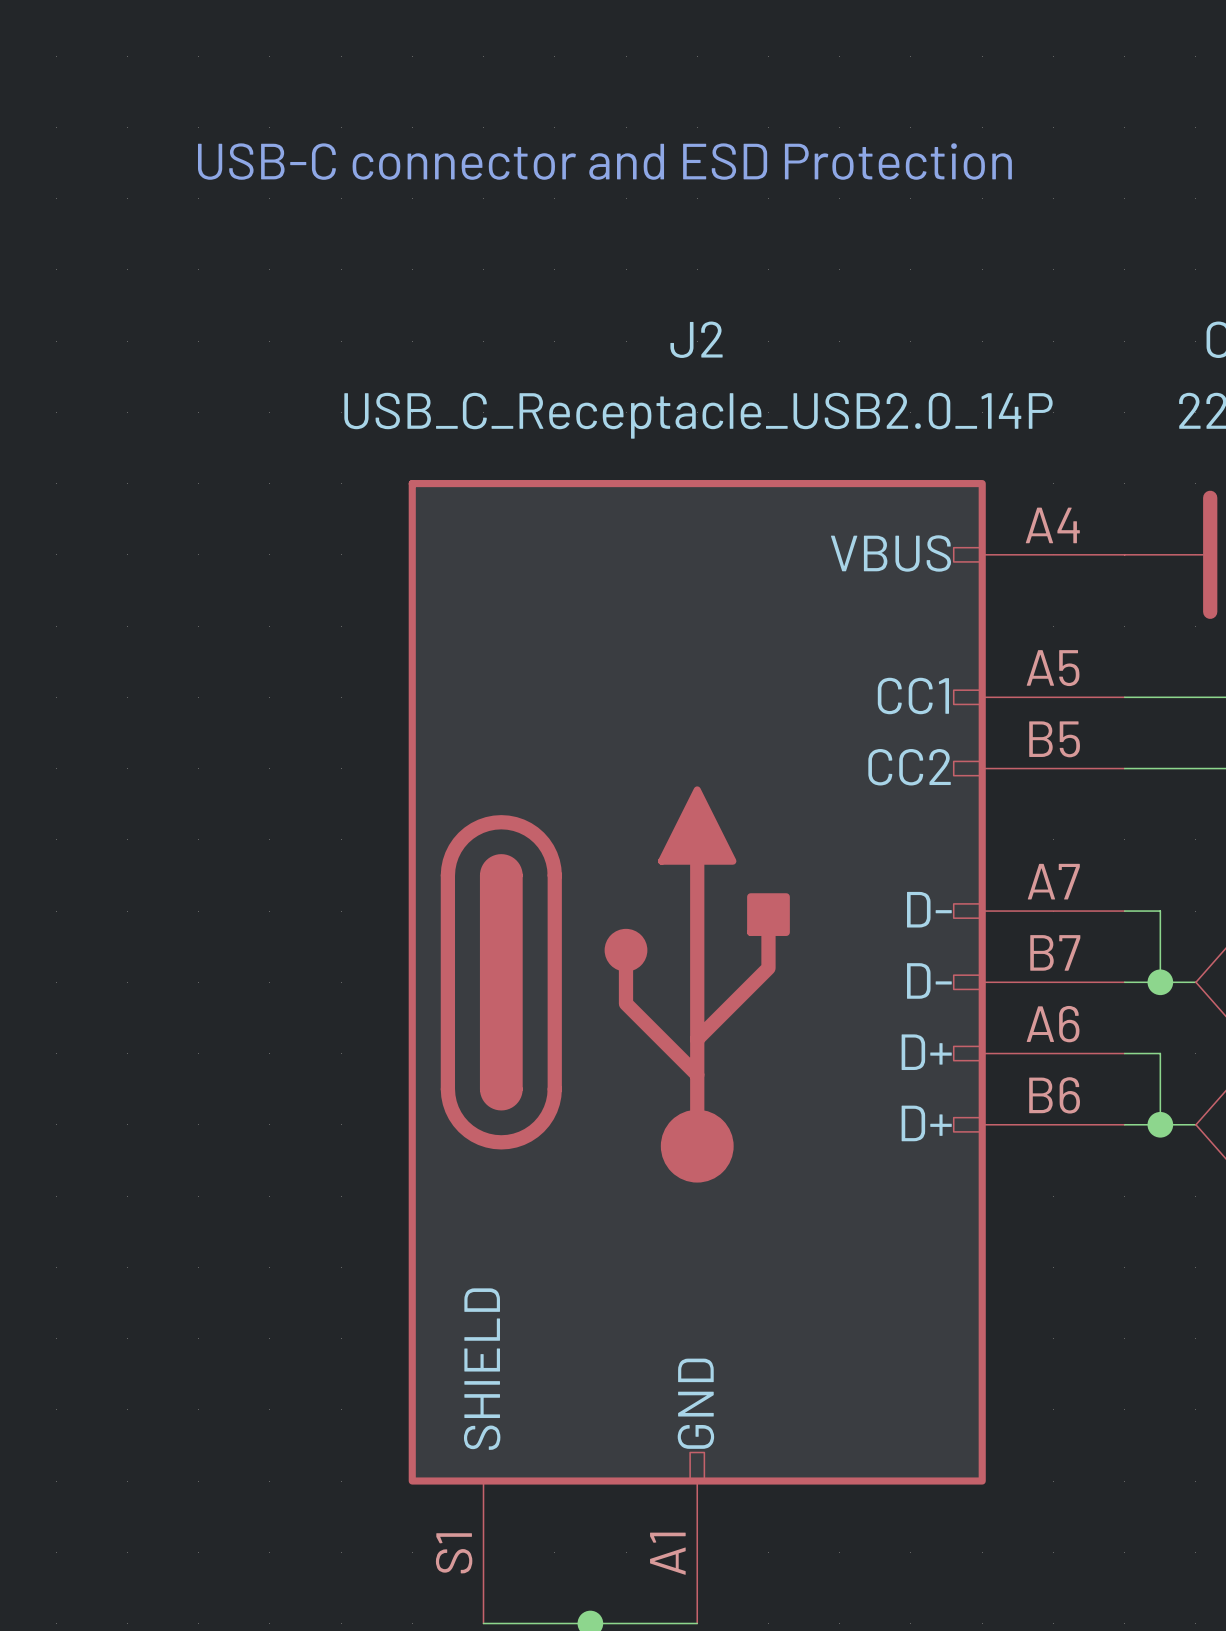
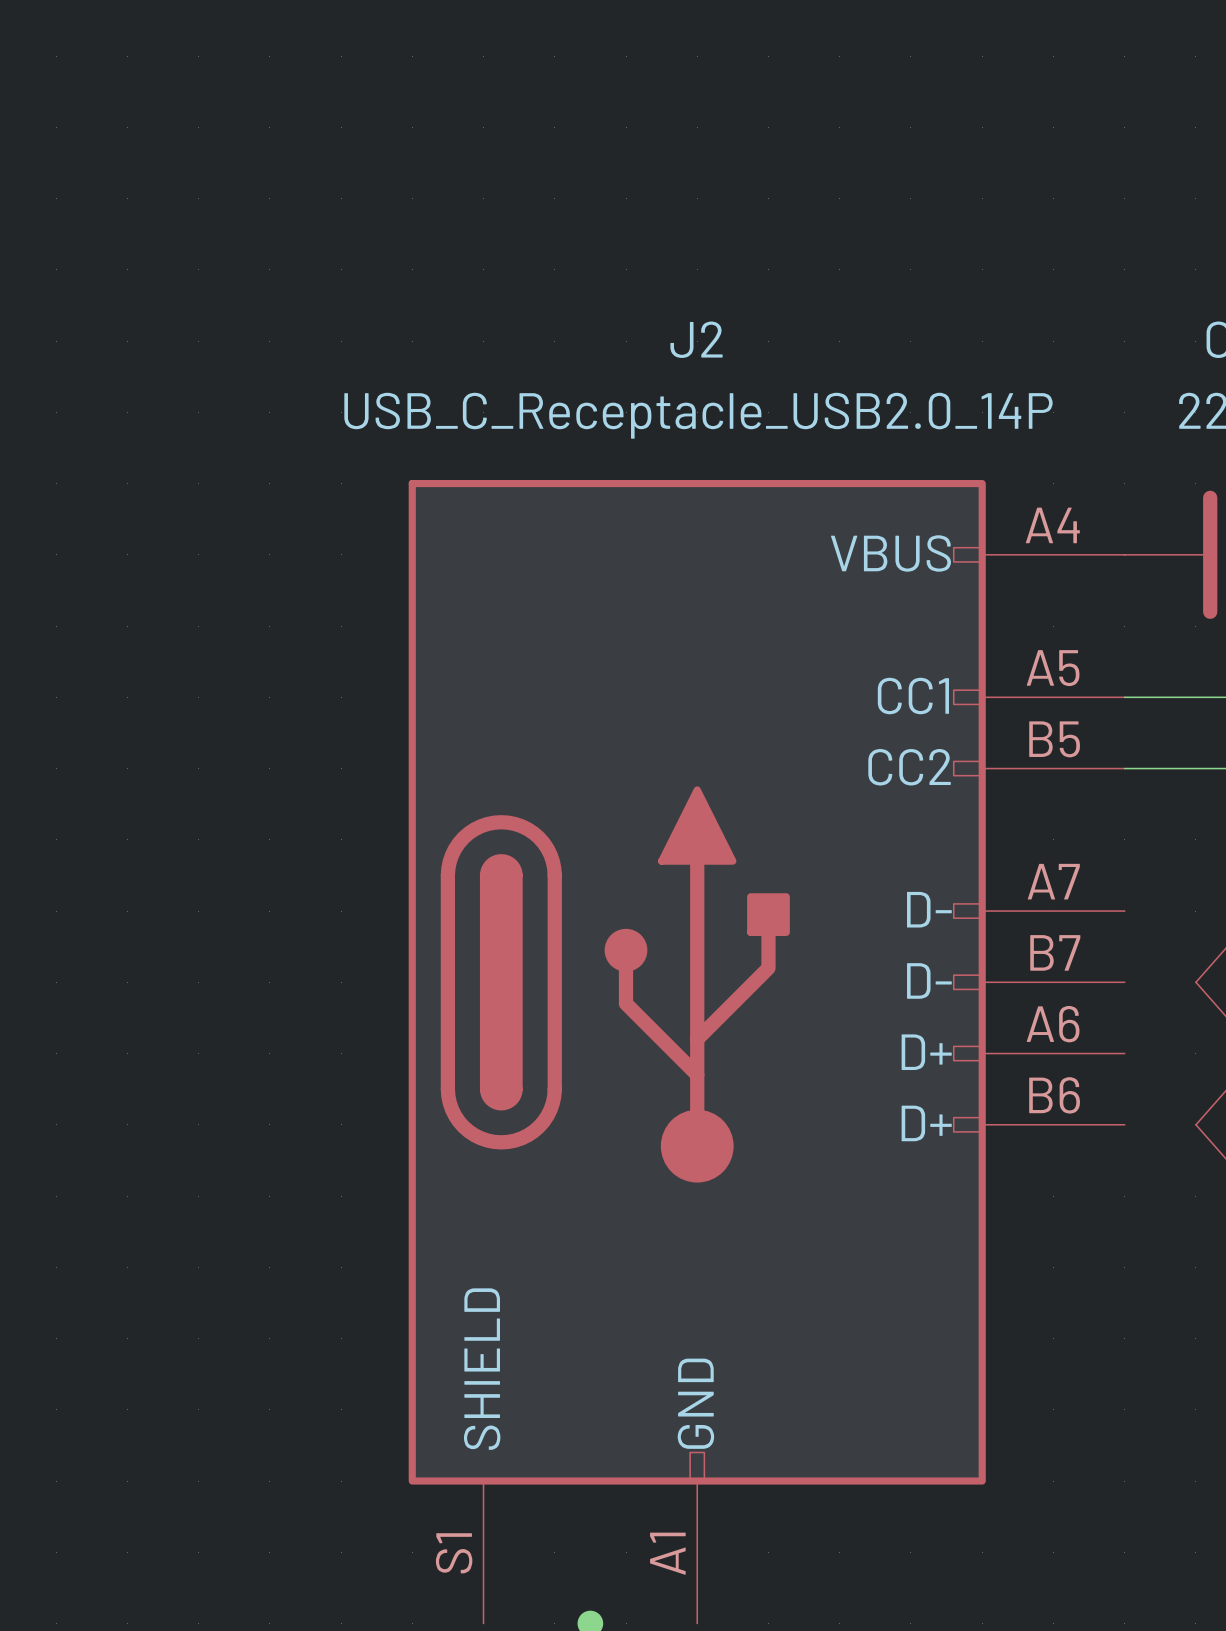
text: USB-C connector and ESD Protection (604, 161) -> none
wire: (1124, 911) (1160, 911) (1160, 982) -> none
wire: (1124, 982) (1195, 982) -> none
junction: (1160, 982) -> none
wire: (1124, 1053) (1160, 1053) (1160, 1124) -> none
wire: (1124, 1124) (1195, 1124) -> none
junction: (1160, 1124) -> none
wire: (483, 1623) (697, 1623) -> none

